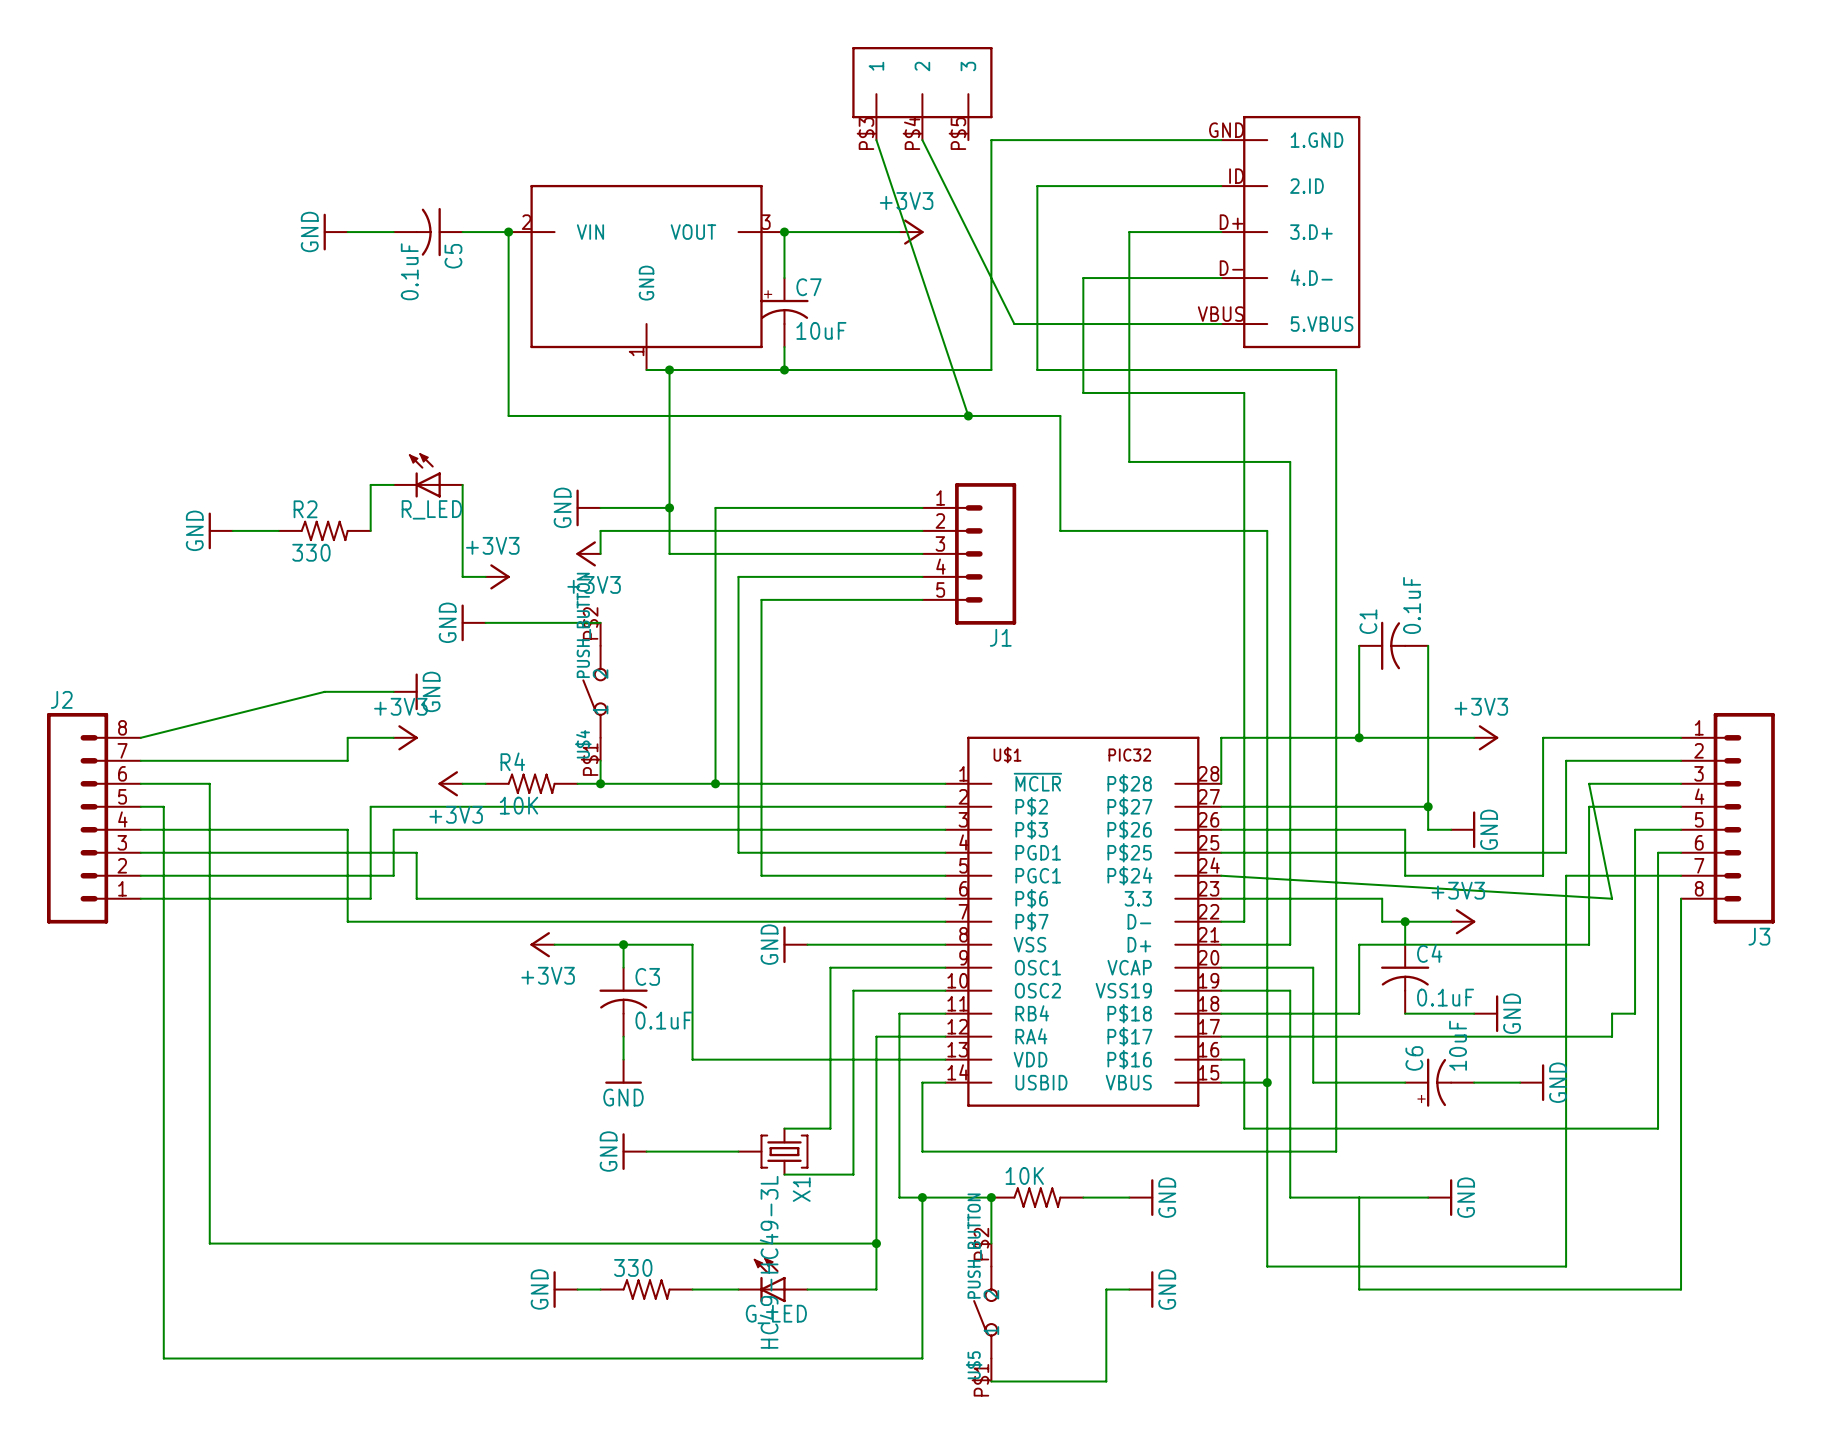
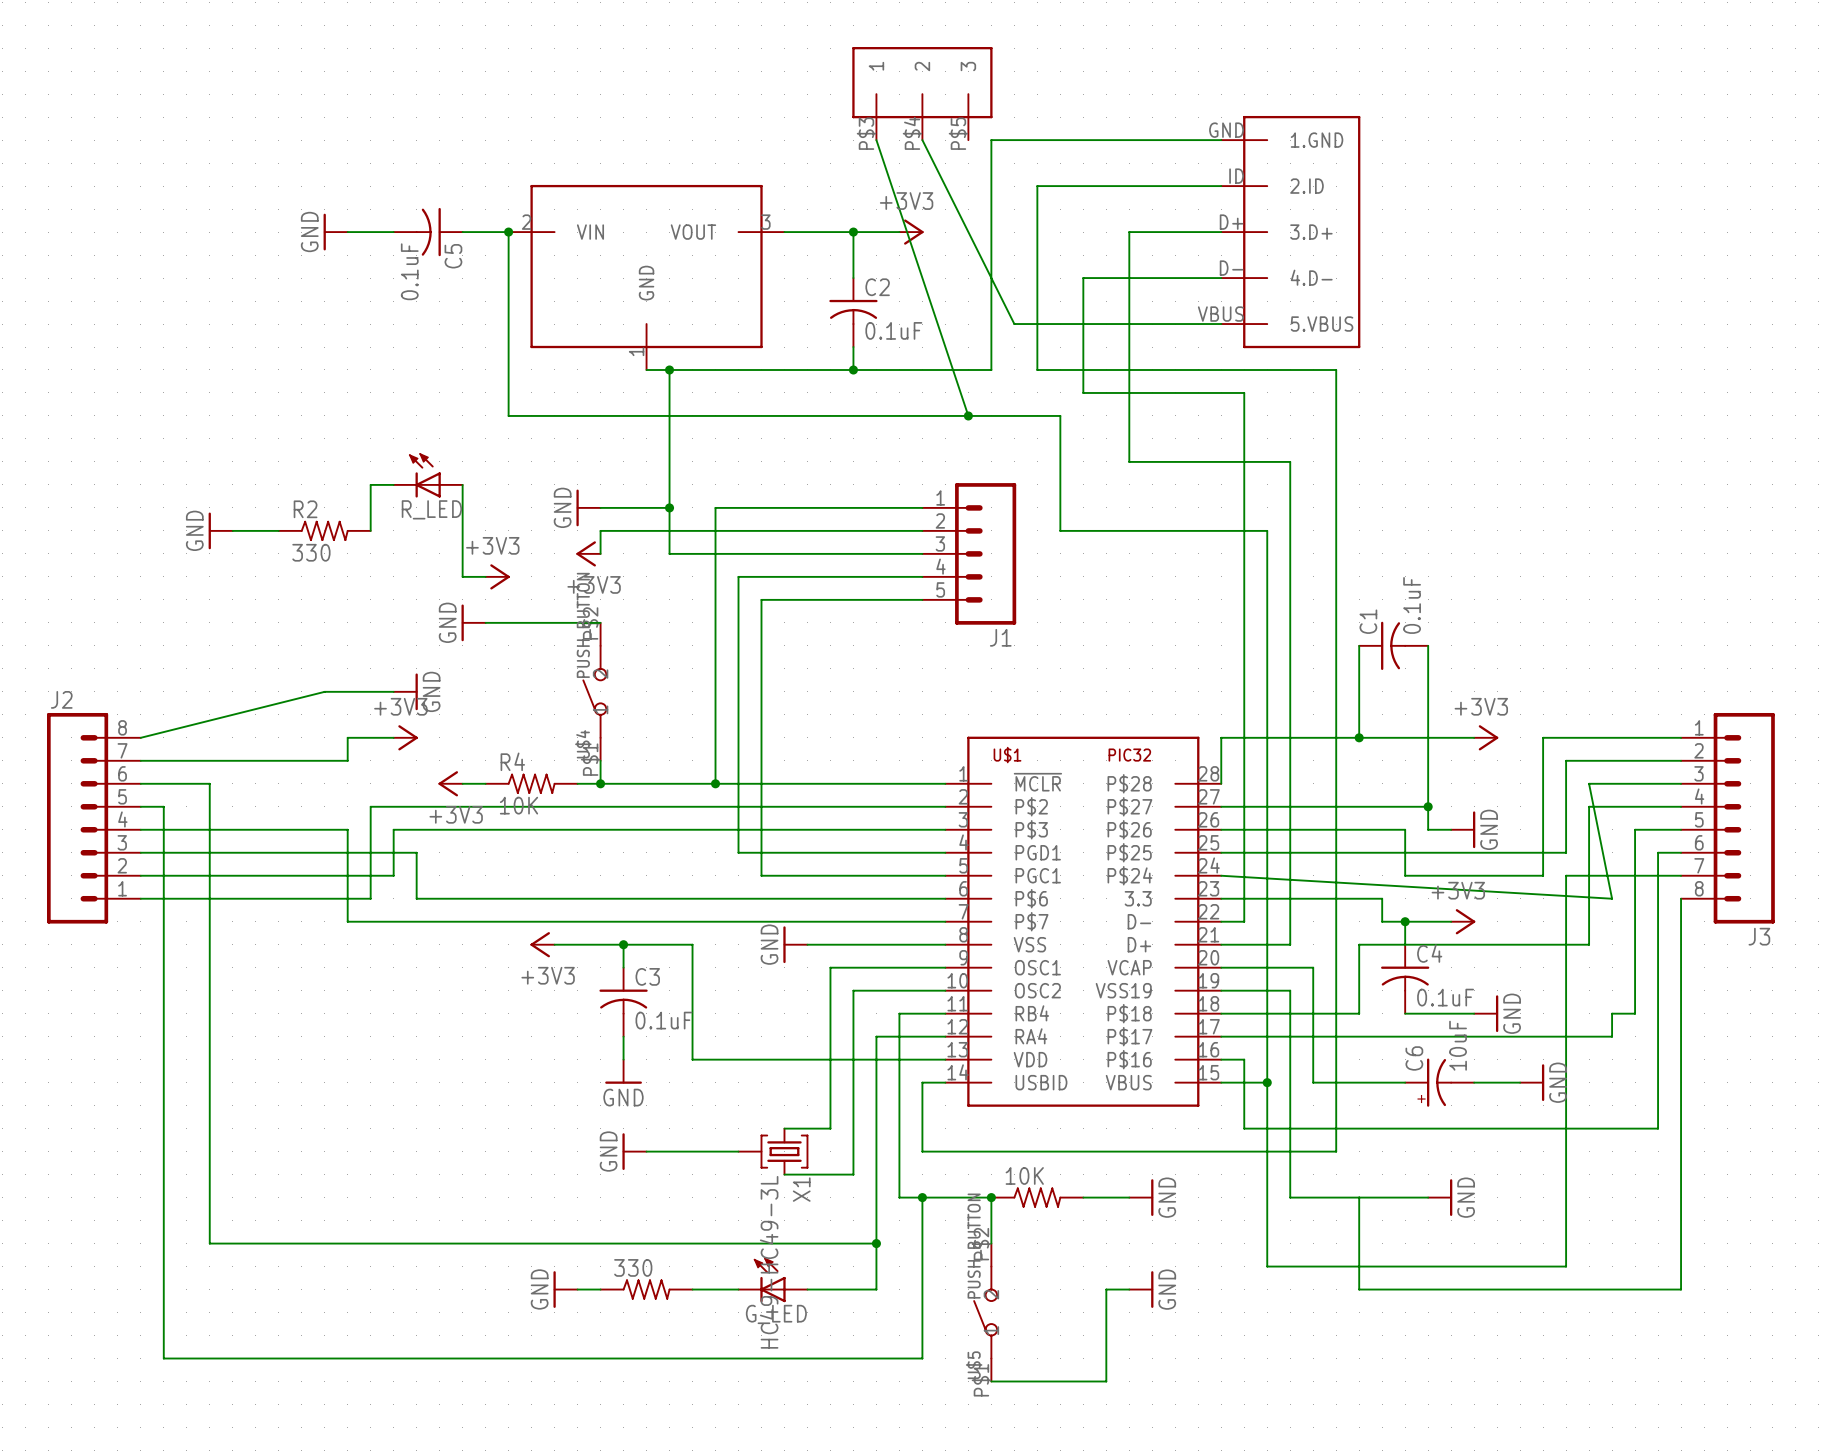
wire: (784, 232) (784, 278) -> (853, 232) (853, 278)
junction: (784, 232) -> none
junction: none -> (853, 232)
C7: 10uF (784, 312) -> none
C2: none -> 0.1uF (853, 312)
wire: (784, 347) (784, 369) -> (853, 347) (853, 369)
junction: (784, 369) -> none
junction: none -> (853, 369)

